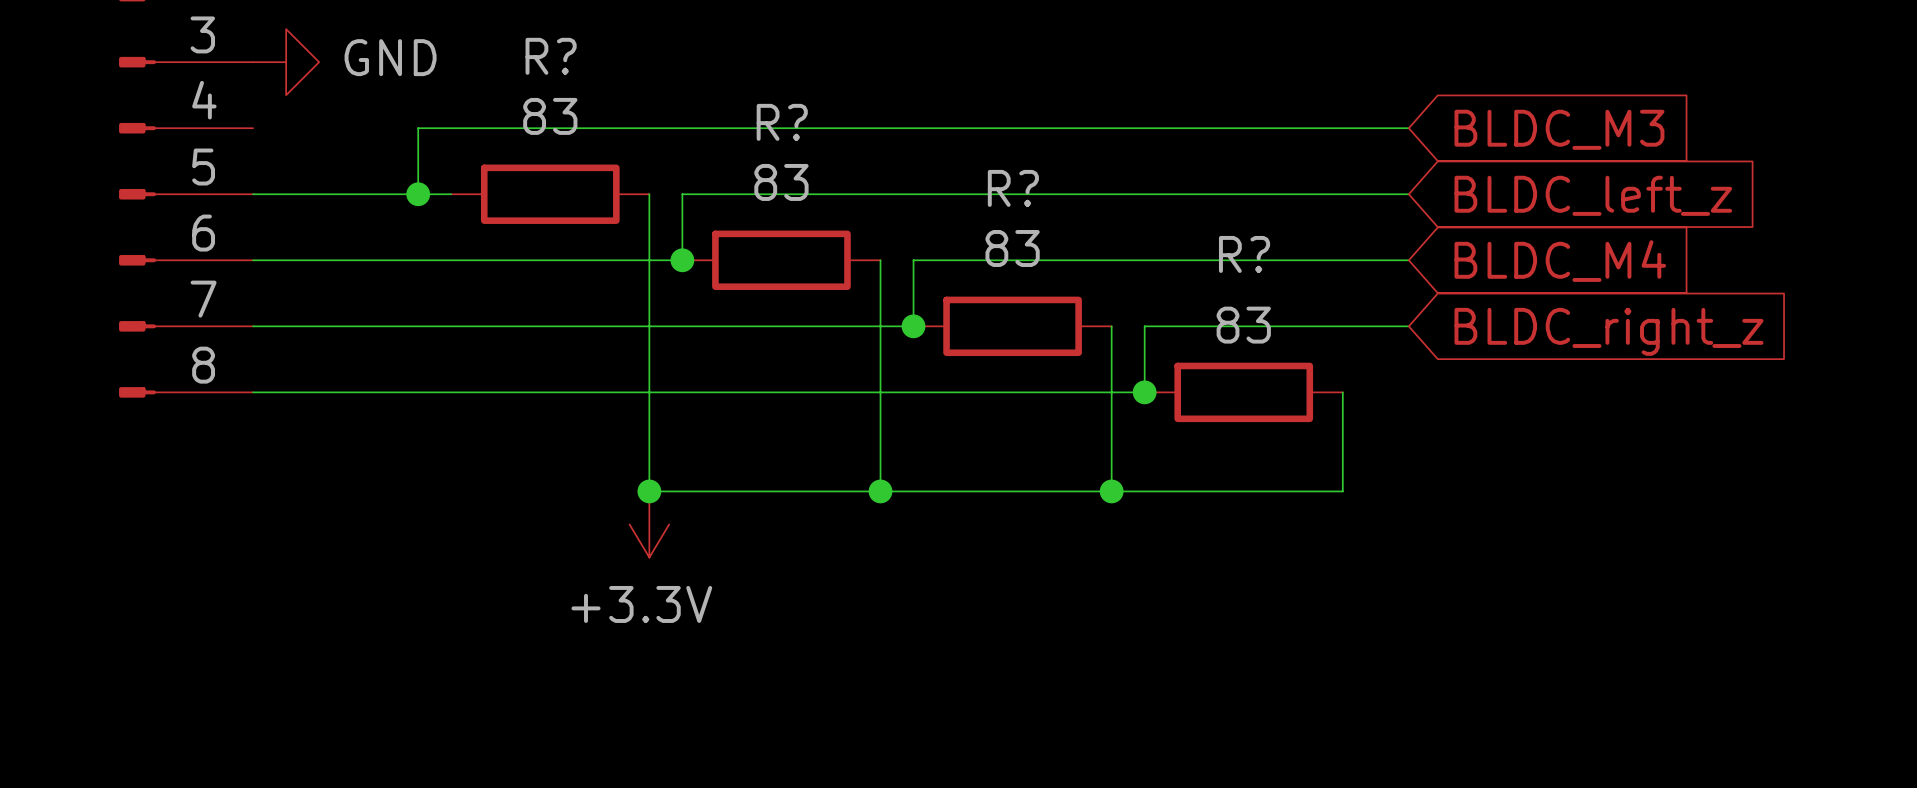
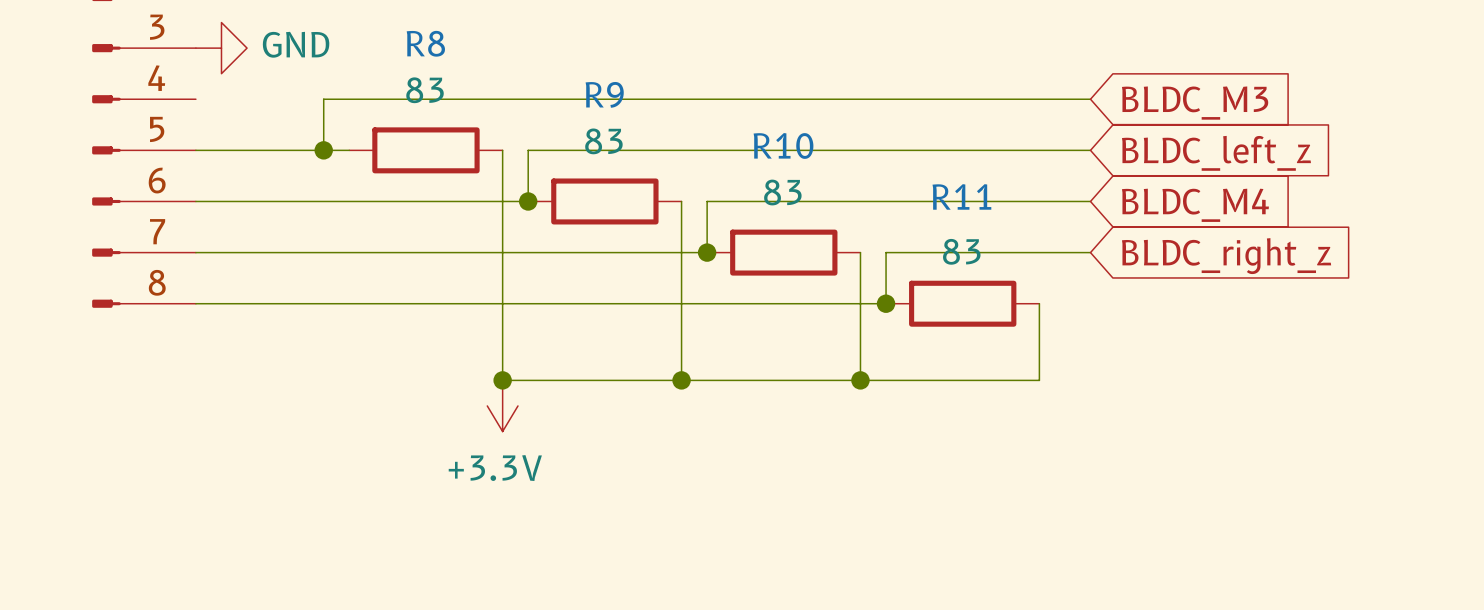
R? name: R? (551, 56) -> R8 (425, 43)
R? name: R? (782, 122) -> R9 (604, 94)
R? name: R? (1013, 188) -> R10 (783, 145)
R? name: R? (1244, 254) -> R11 (961, 196)

